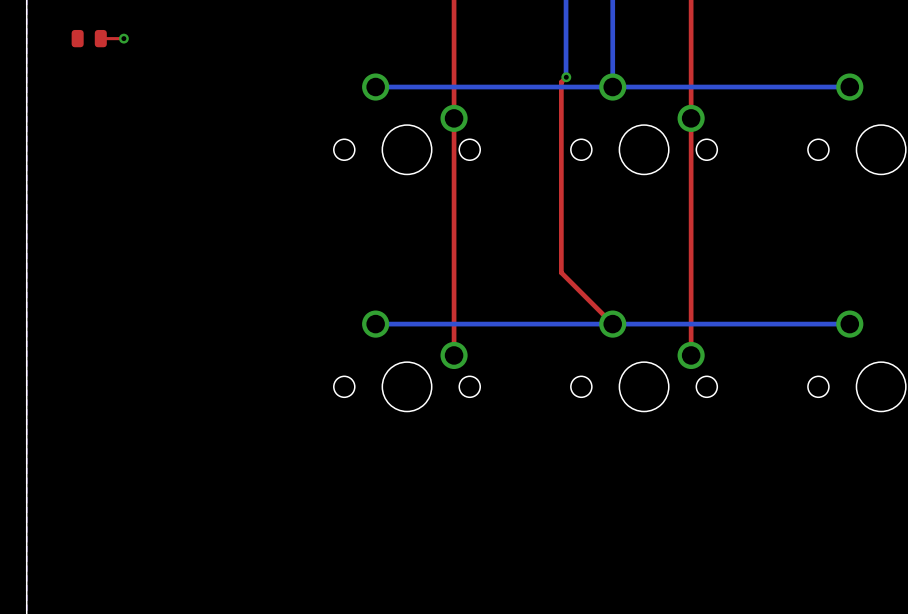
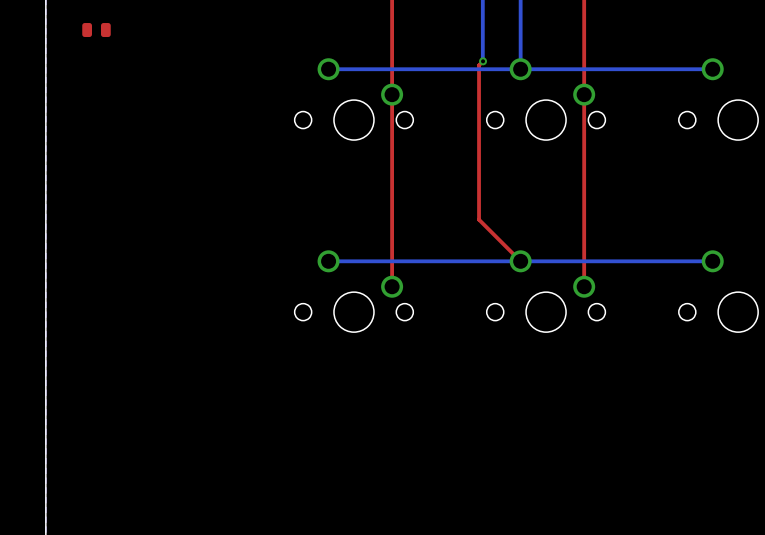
top track: (123, 38) (100, 38) -> none
via: (123, 38) -> none

